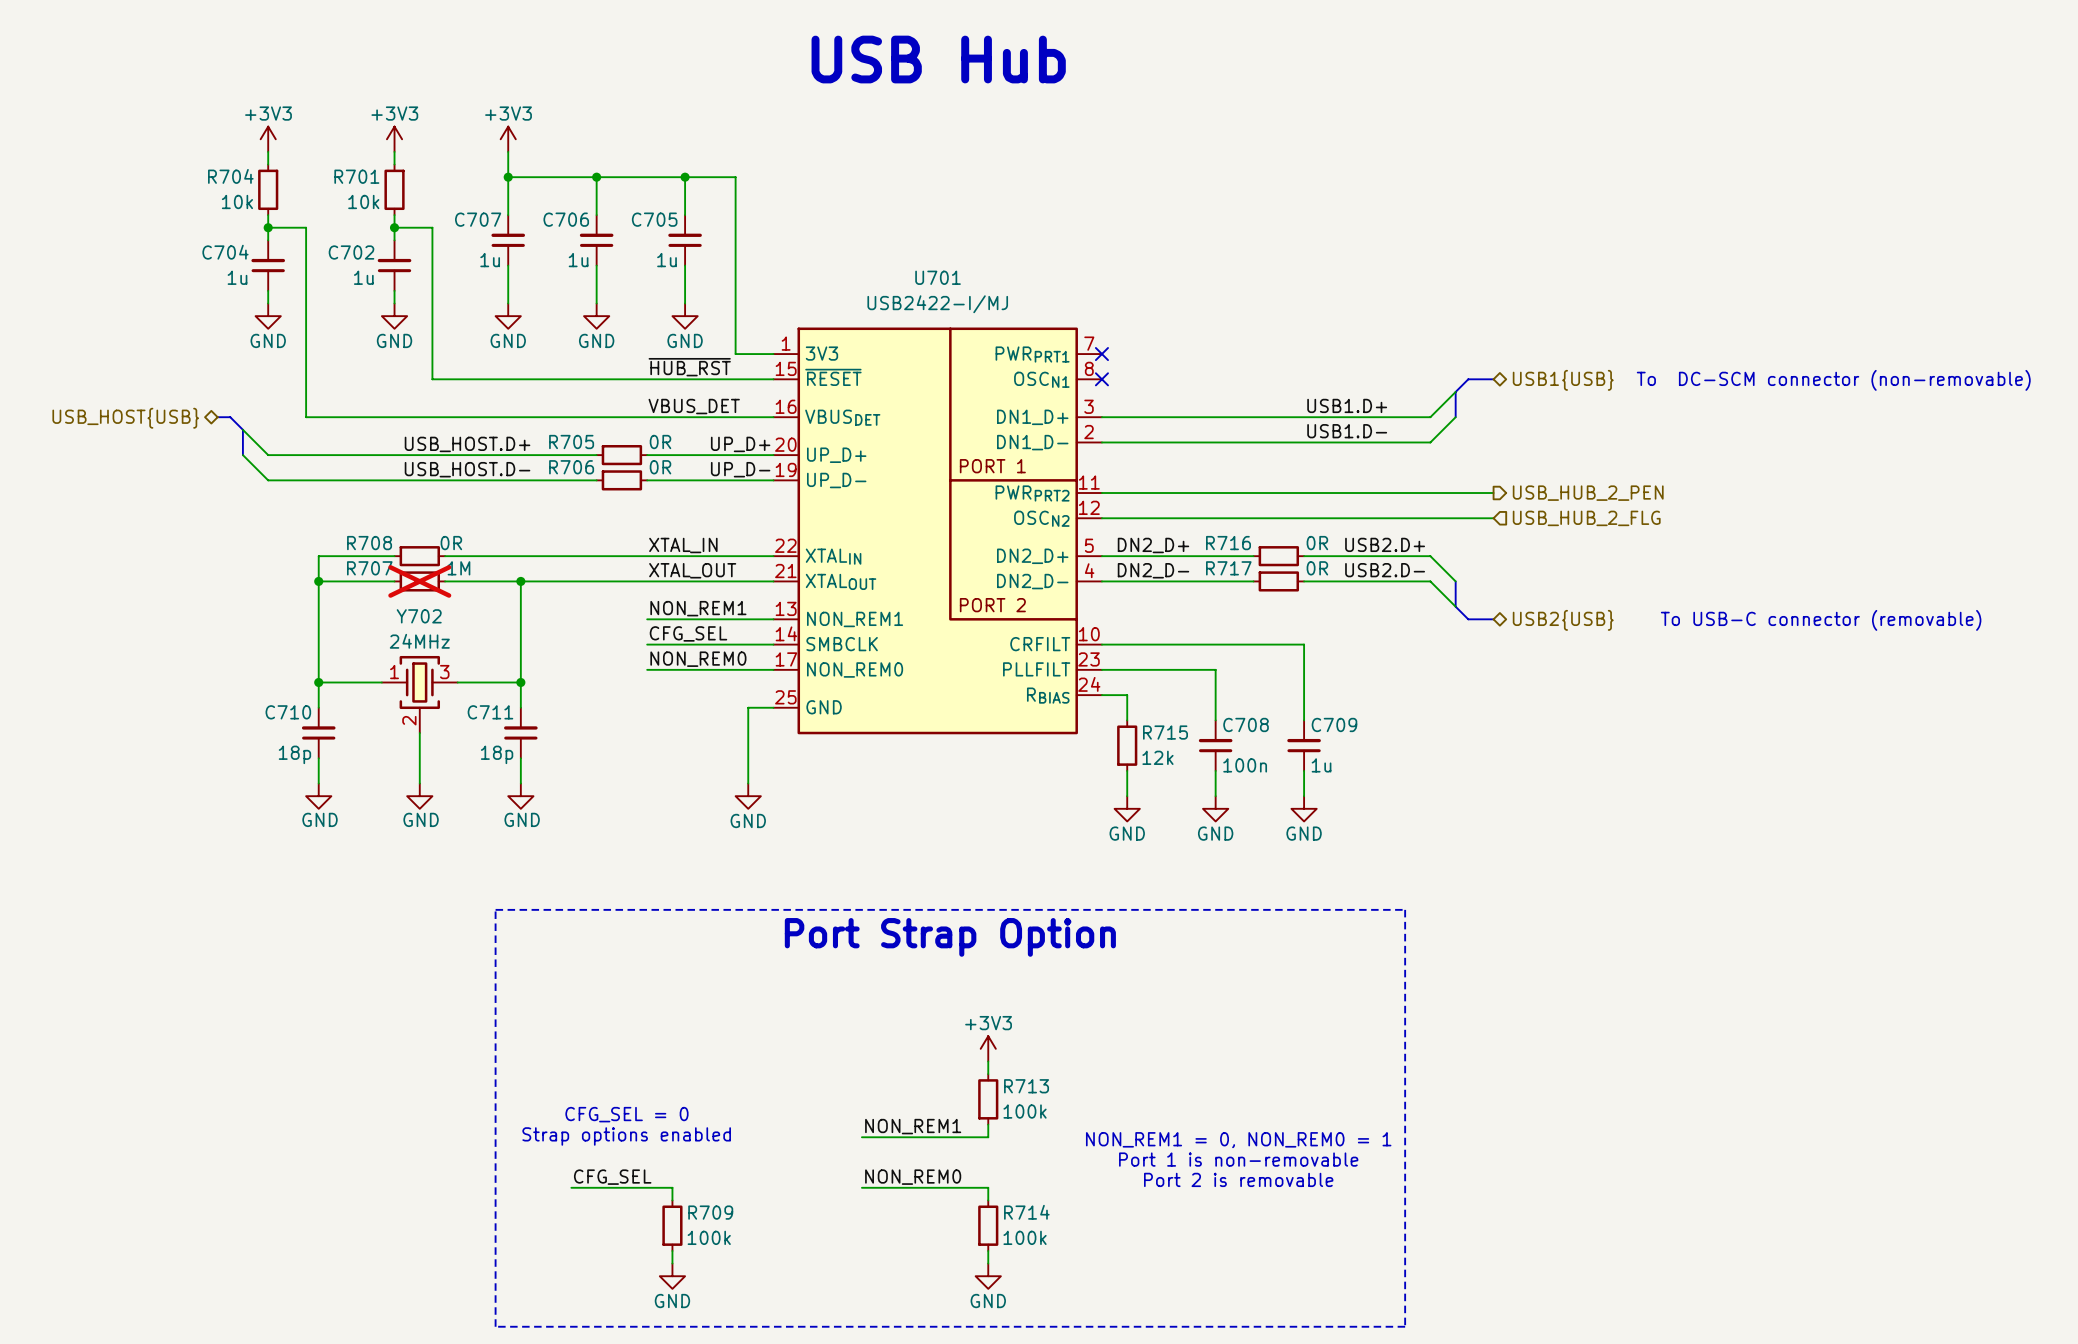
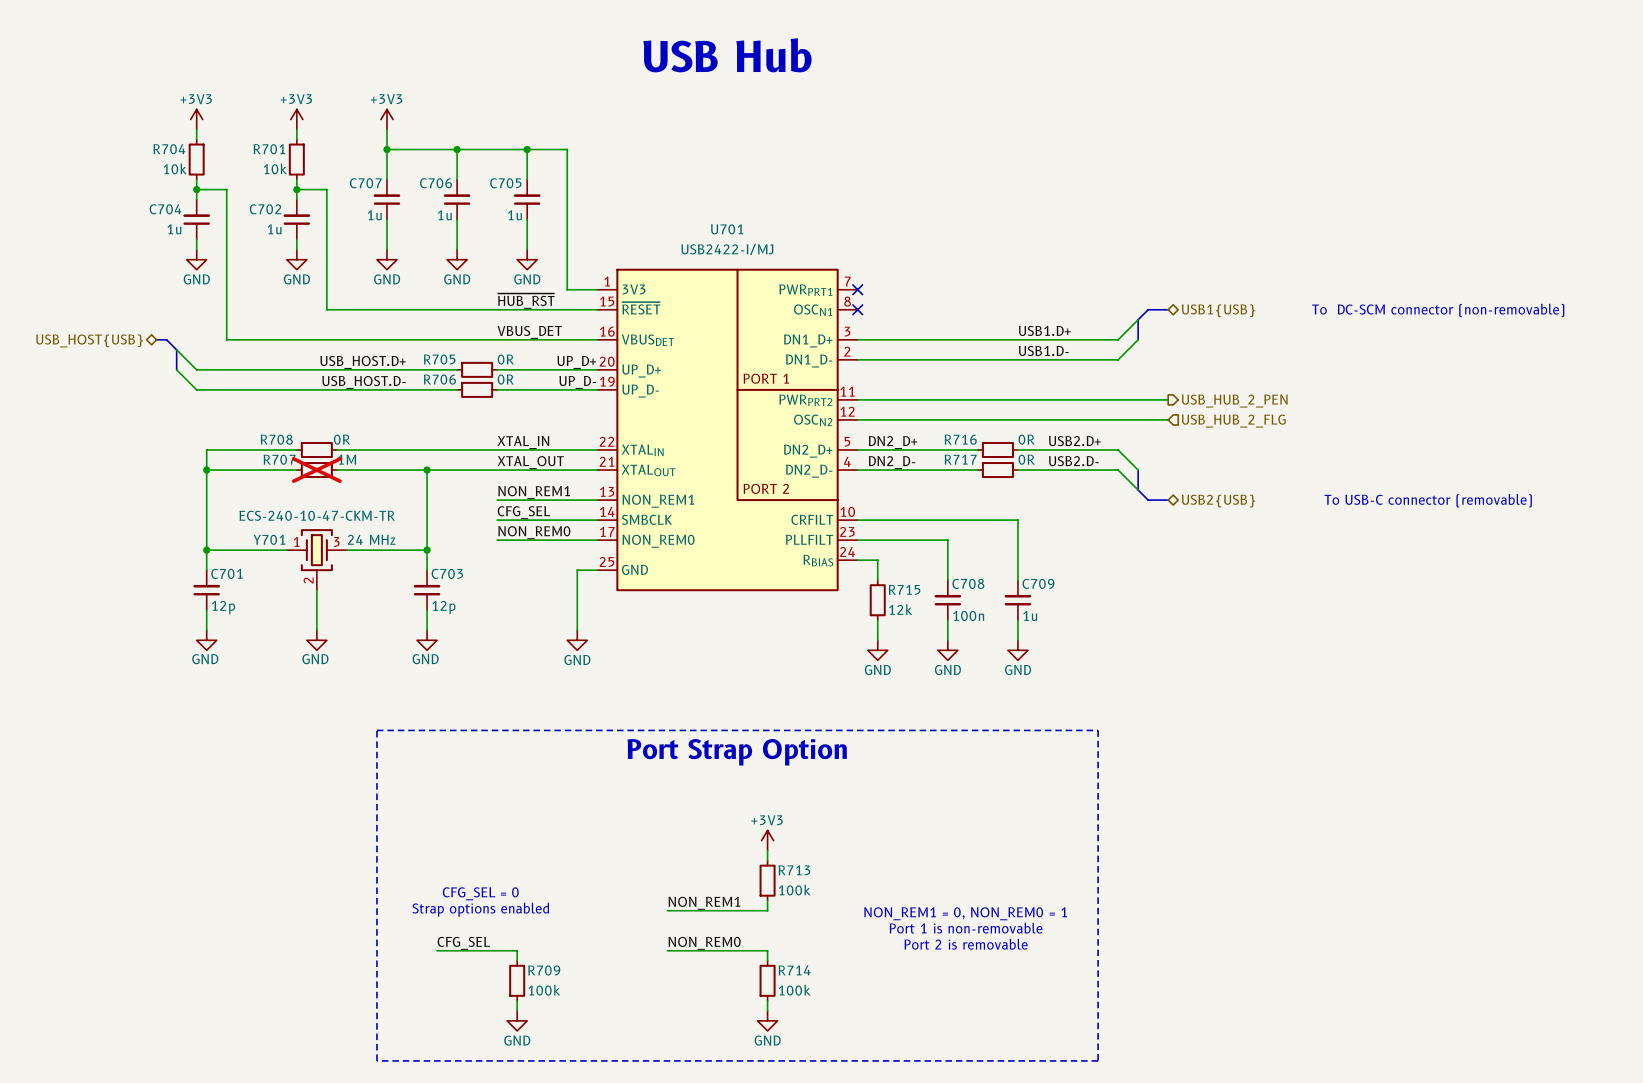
wire: (318, 556) (318, 707) -> (236, 450) (206, 450) (206, 570)
wire: none -> (206, 470) (236, 470)
junction position: (318, 581) -> (206, 470)
wire: (520, 581) (520, 707) -> (427, 470) (427, 570)
junction position: (520, 581) -> (427, 470)
Y702 name: Y702 (419, 616) -> Y701 (269, 539)
Y702 text: none -> ECS-240-10-47-CKM-TR (317, 515)
Y702 text: 24MHz (419, 641) -> 24 MHz (371, 539)
wire: none -> (206, 550) (236, 550)
junction position: (318, 682) -> (206, 550)
wire: none -> (397, 550) (427, 550)
junction position: (520, 682) -> (427, 550)
C701: none -> (206, 590)
C710: (318, 733) -> none
C711: (520, 733) -> none
C703: none -> (427, 590)
wire: (318, 758) (318, 783) -> (206, 610) (206, 630)
wire: (520, 758) (520, 783) -> (427, 610) (427, 630)
power symbol position: GND (318, 796) -> GND (206, 640)
power symbol position: GND (520, 796) -> GND (427, 640)

